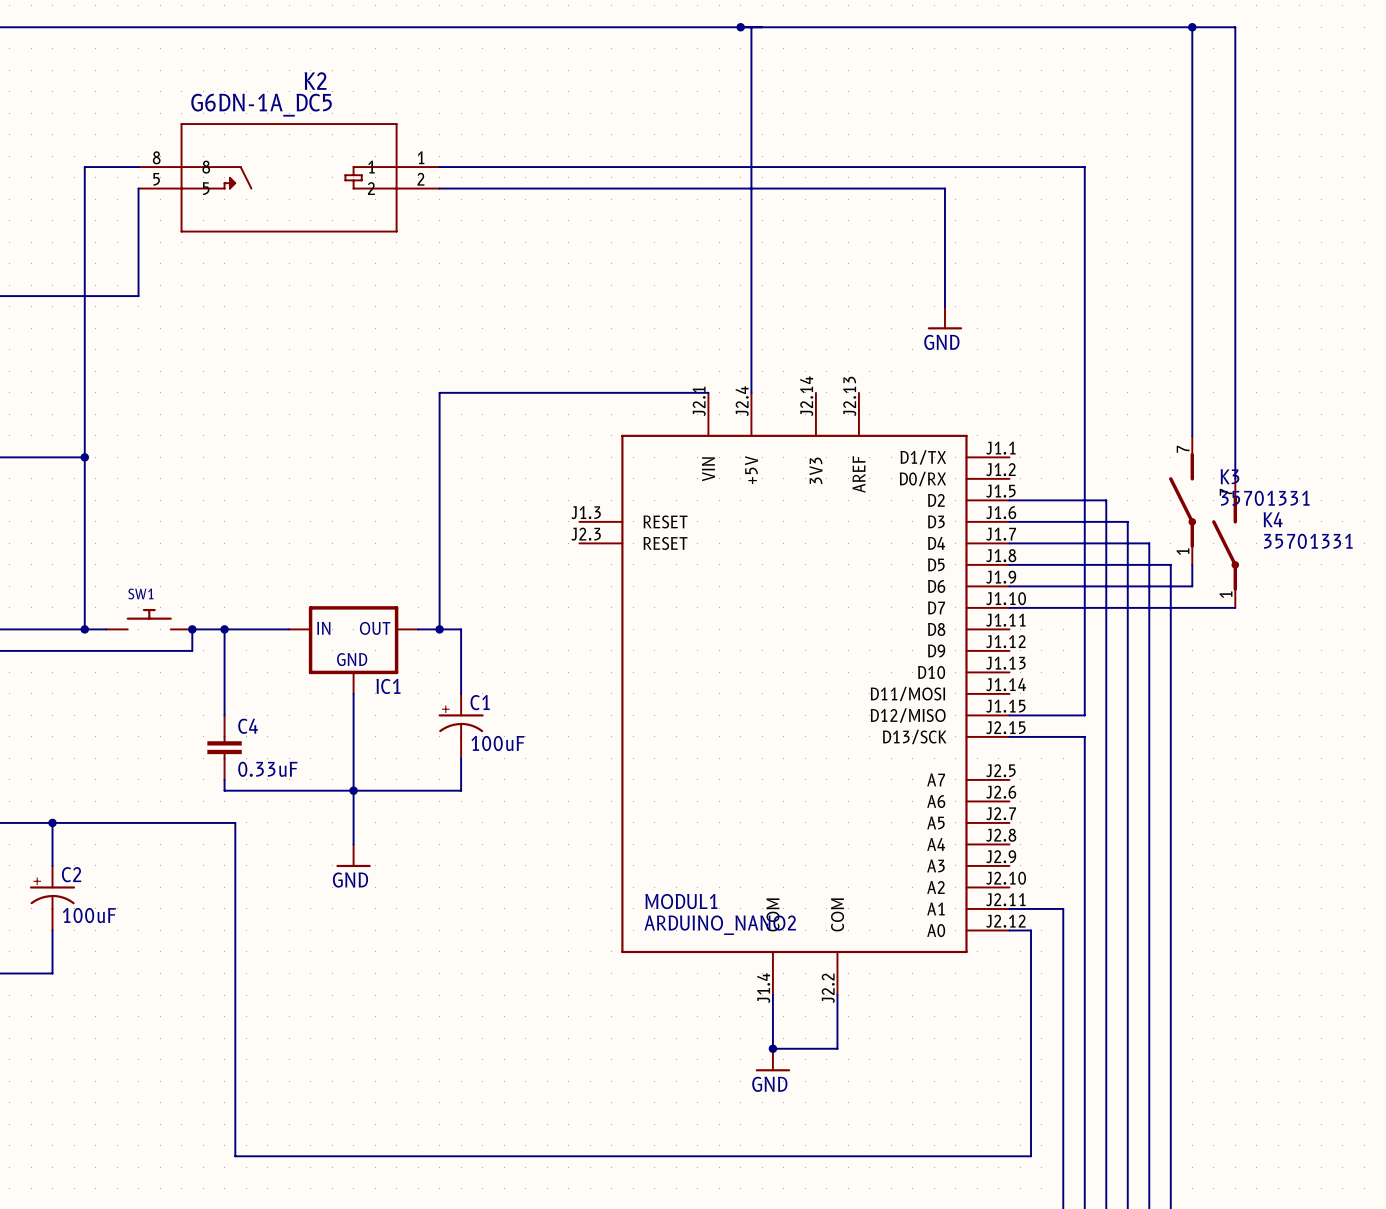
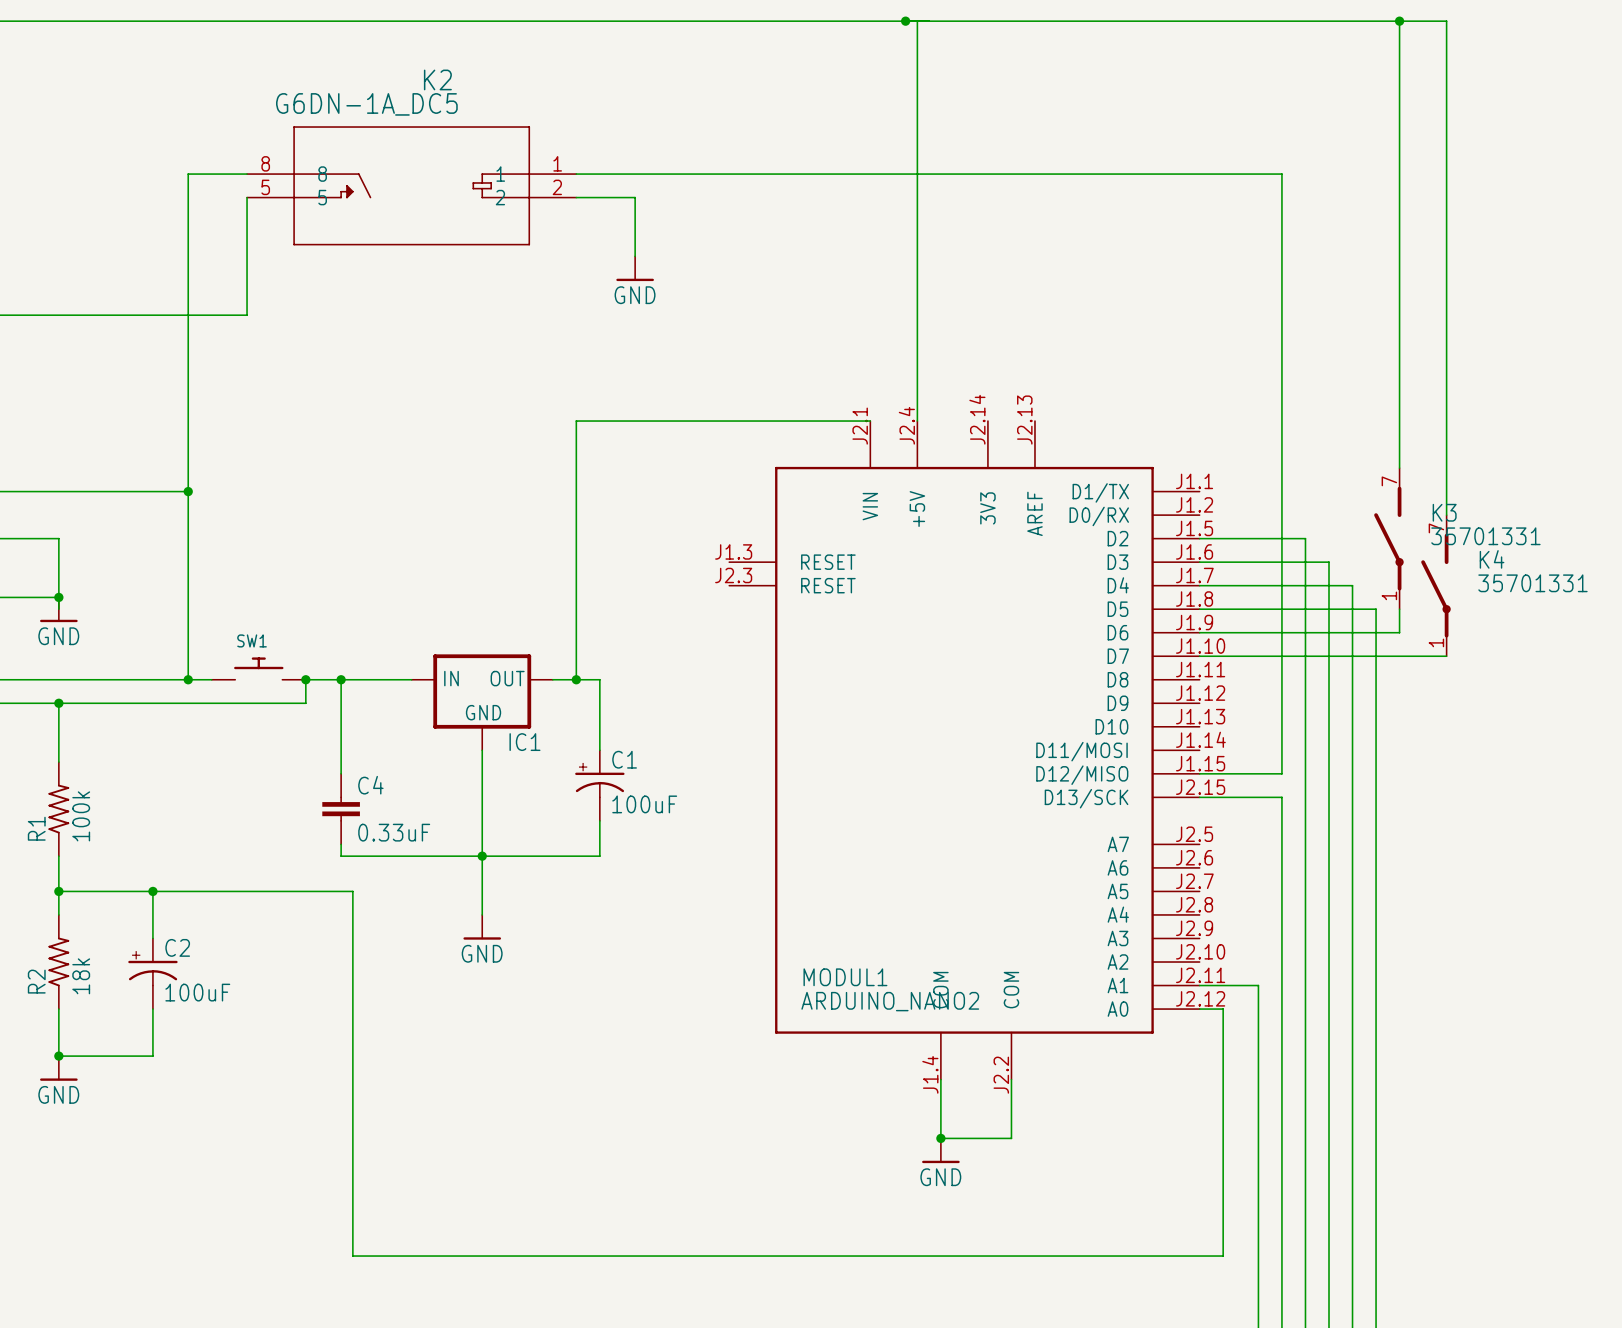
wire: (493, 188) (944, 188) (944, 306) -> (635, 197) (635, 256)
power symbol: none -> GND (635, 268)
power symbol: GND (944, 318) -> none

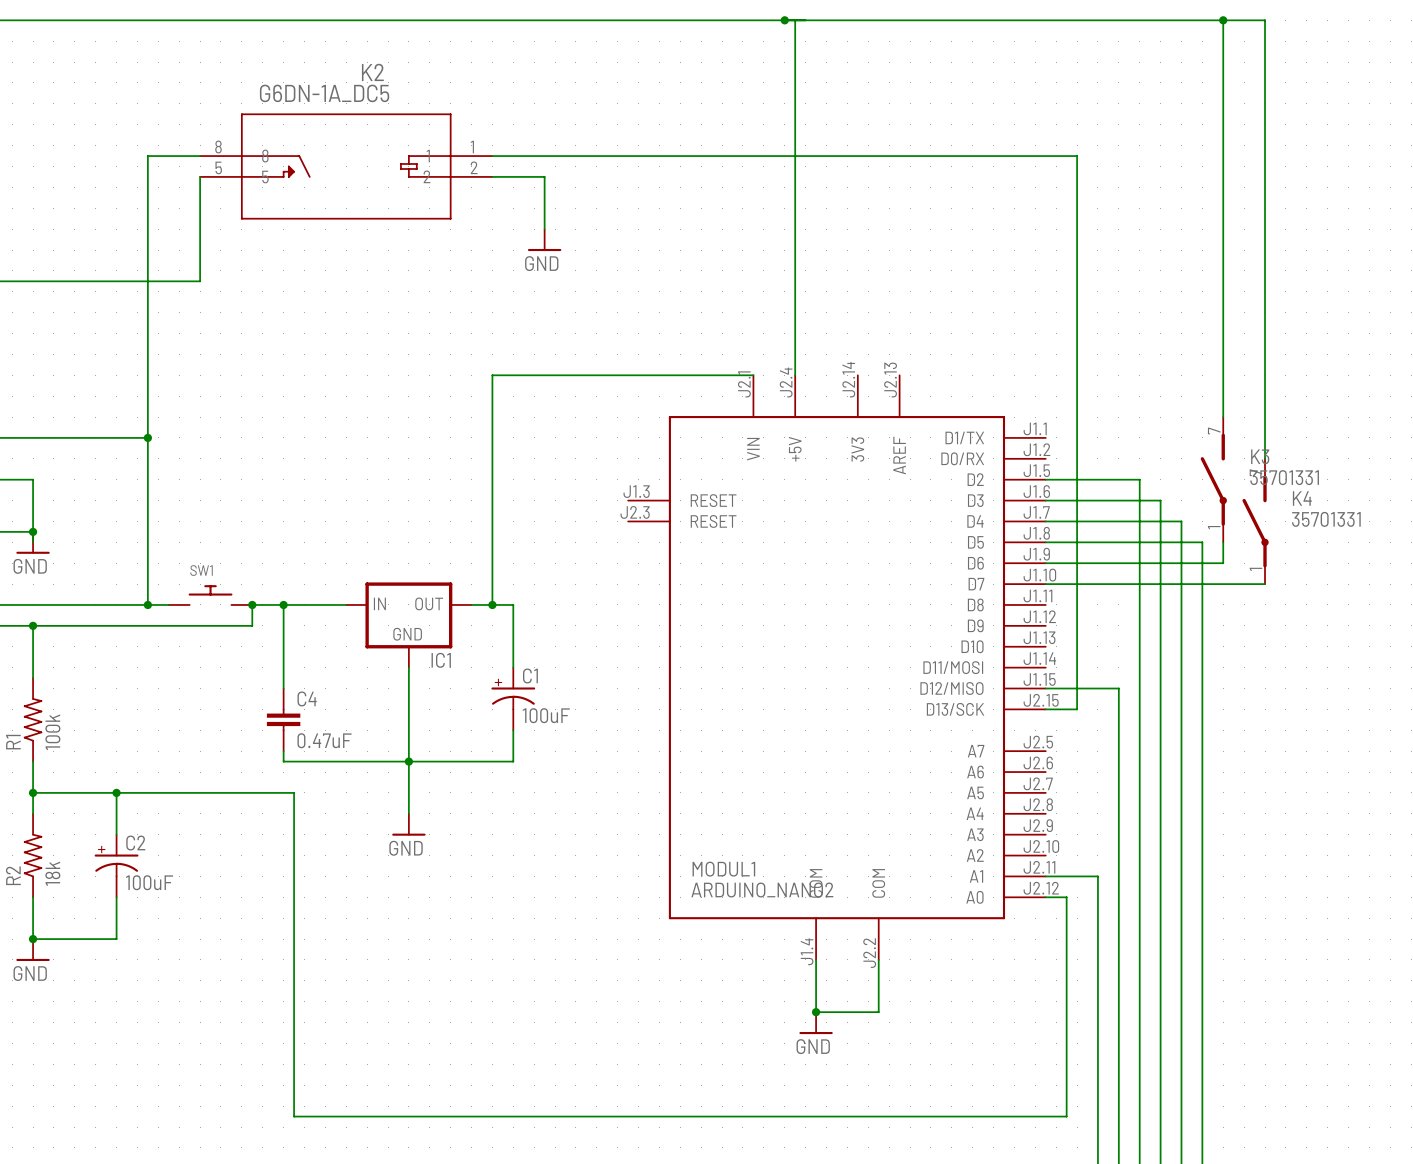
wire: (1234, 174) (1281, 174) (1281, 773) -> (1077, 156) (1077, 709)
wire: (1234, 797) (1281, 797) -> (1118, 688) (1118, 709)
C4 value: 0.33uF (394, 832) -> 0.47uF (324, 740)

